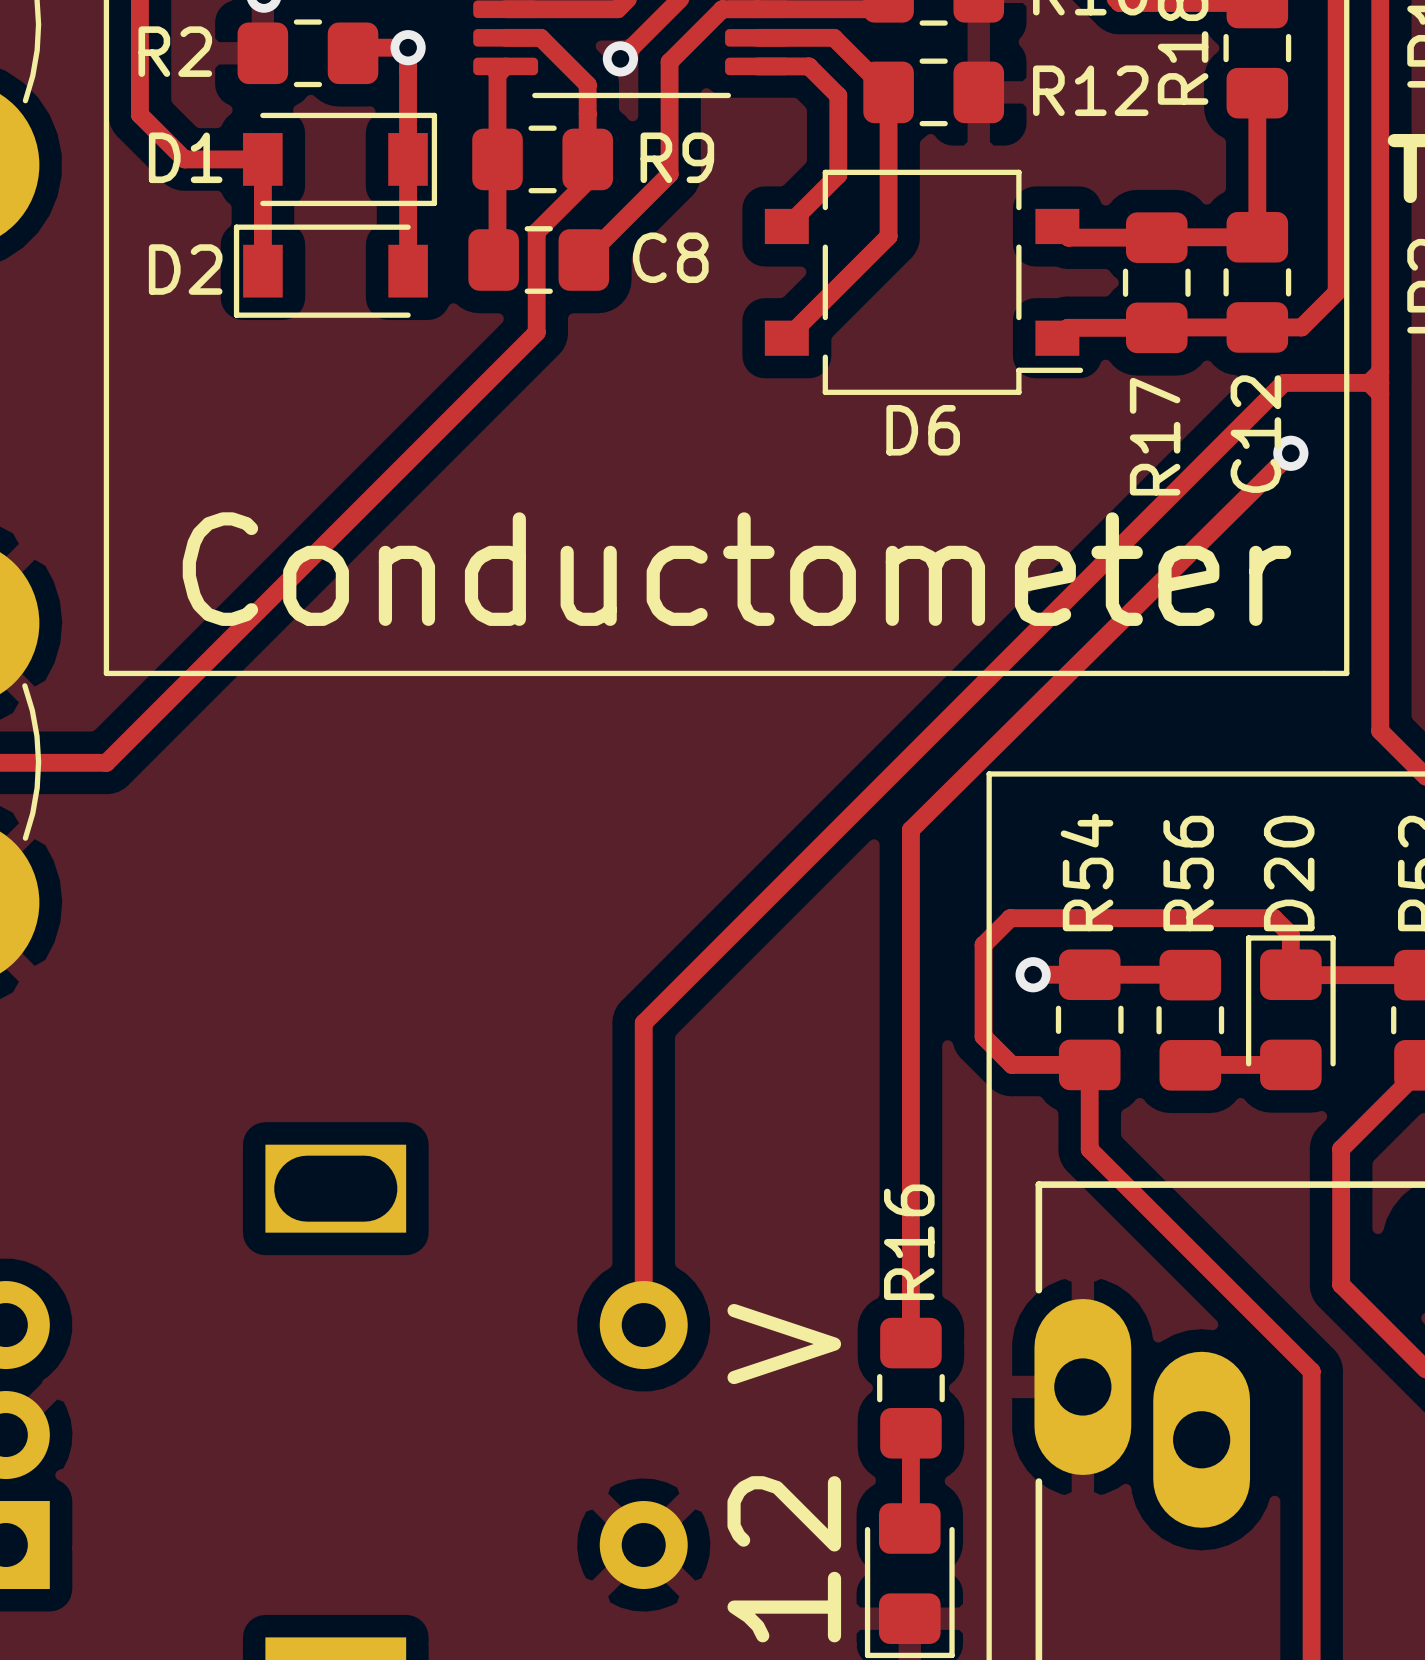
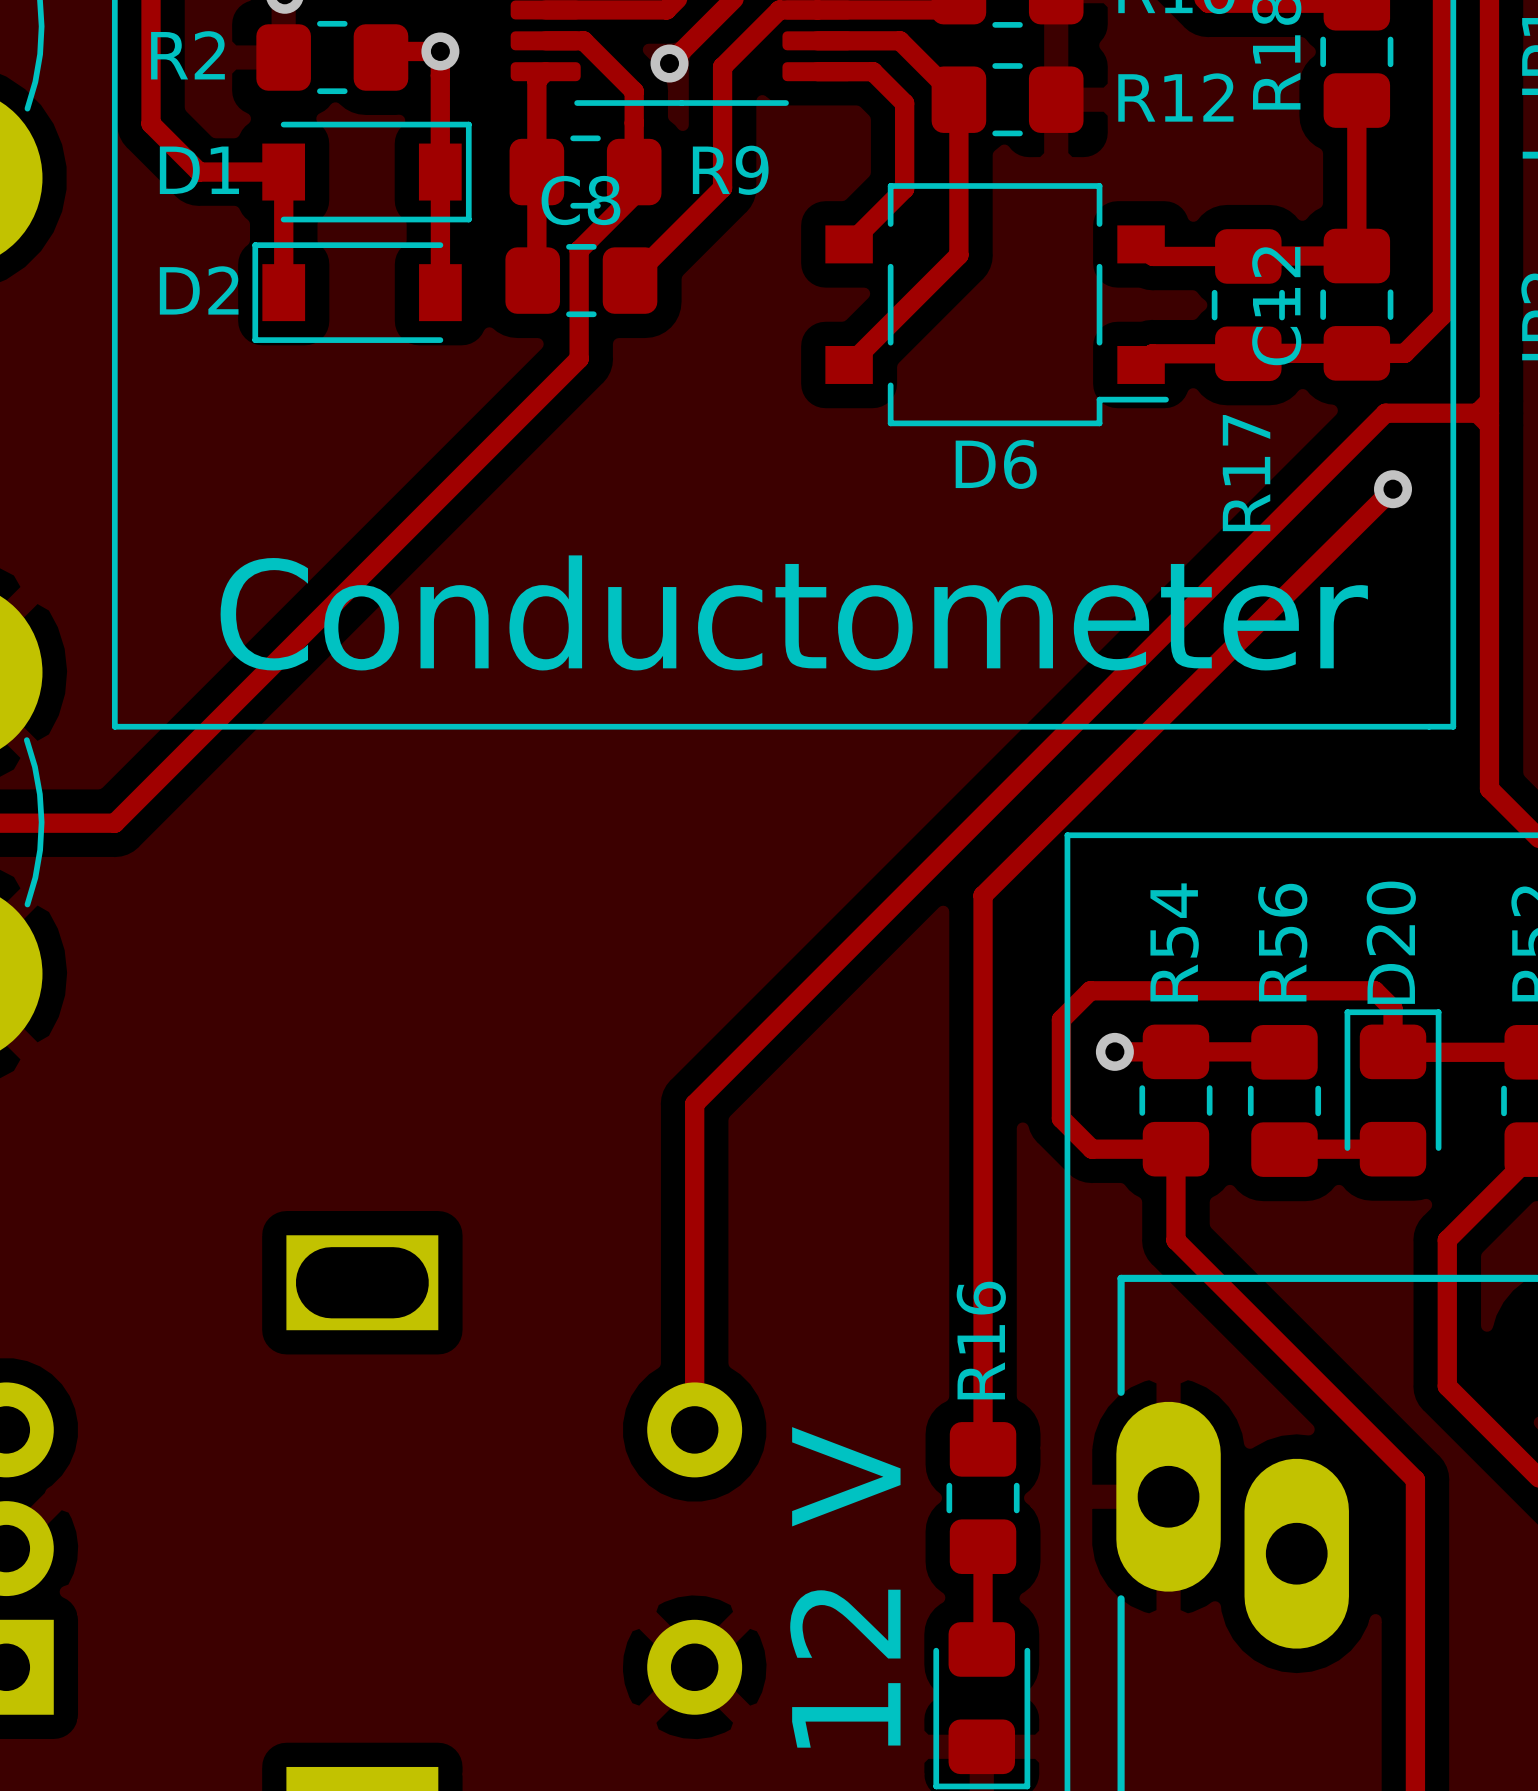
C8 name position: C8 (670, 257) -> C8 (580, 200)
C12 name position: C12 (1255, 434) -> C12 (1276, 306)

